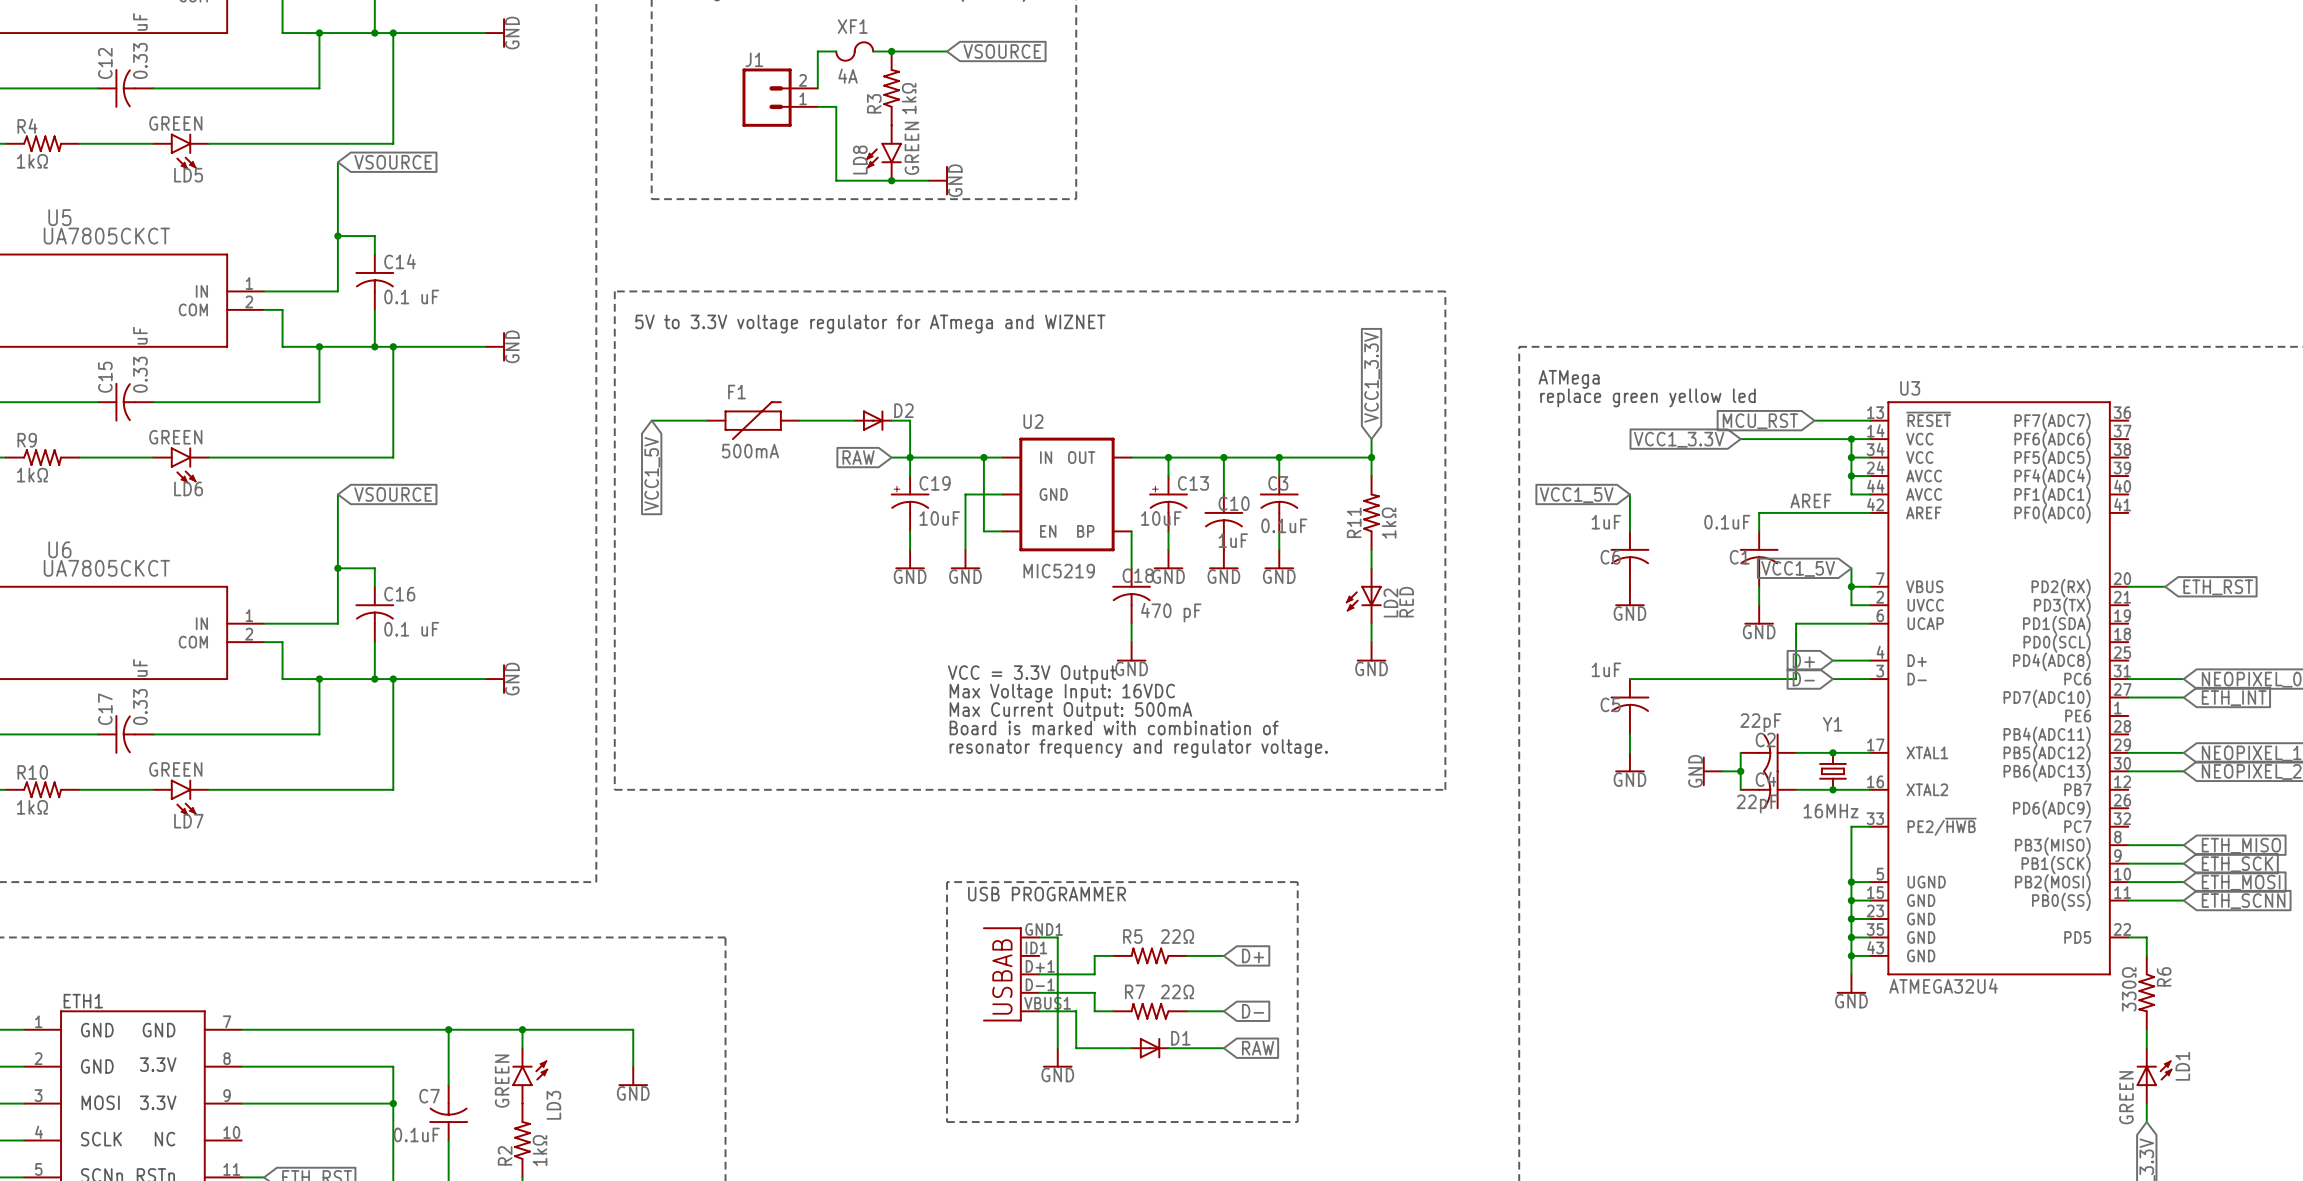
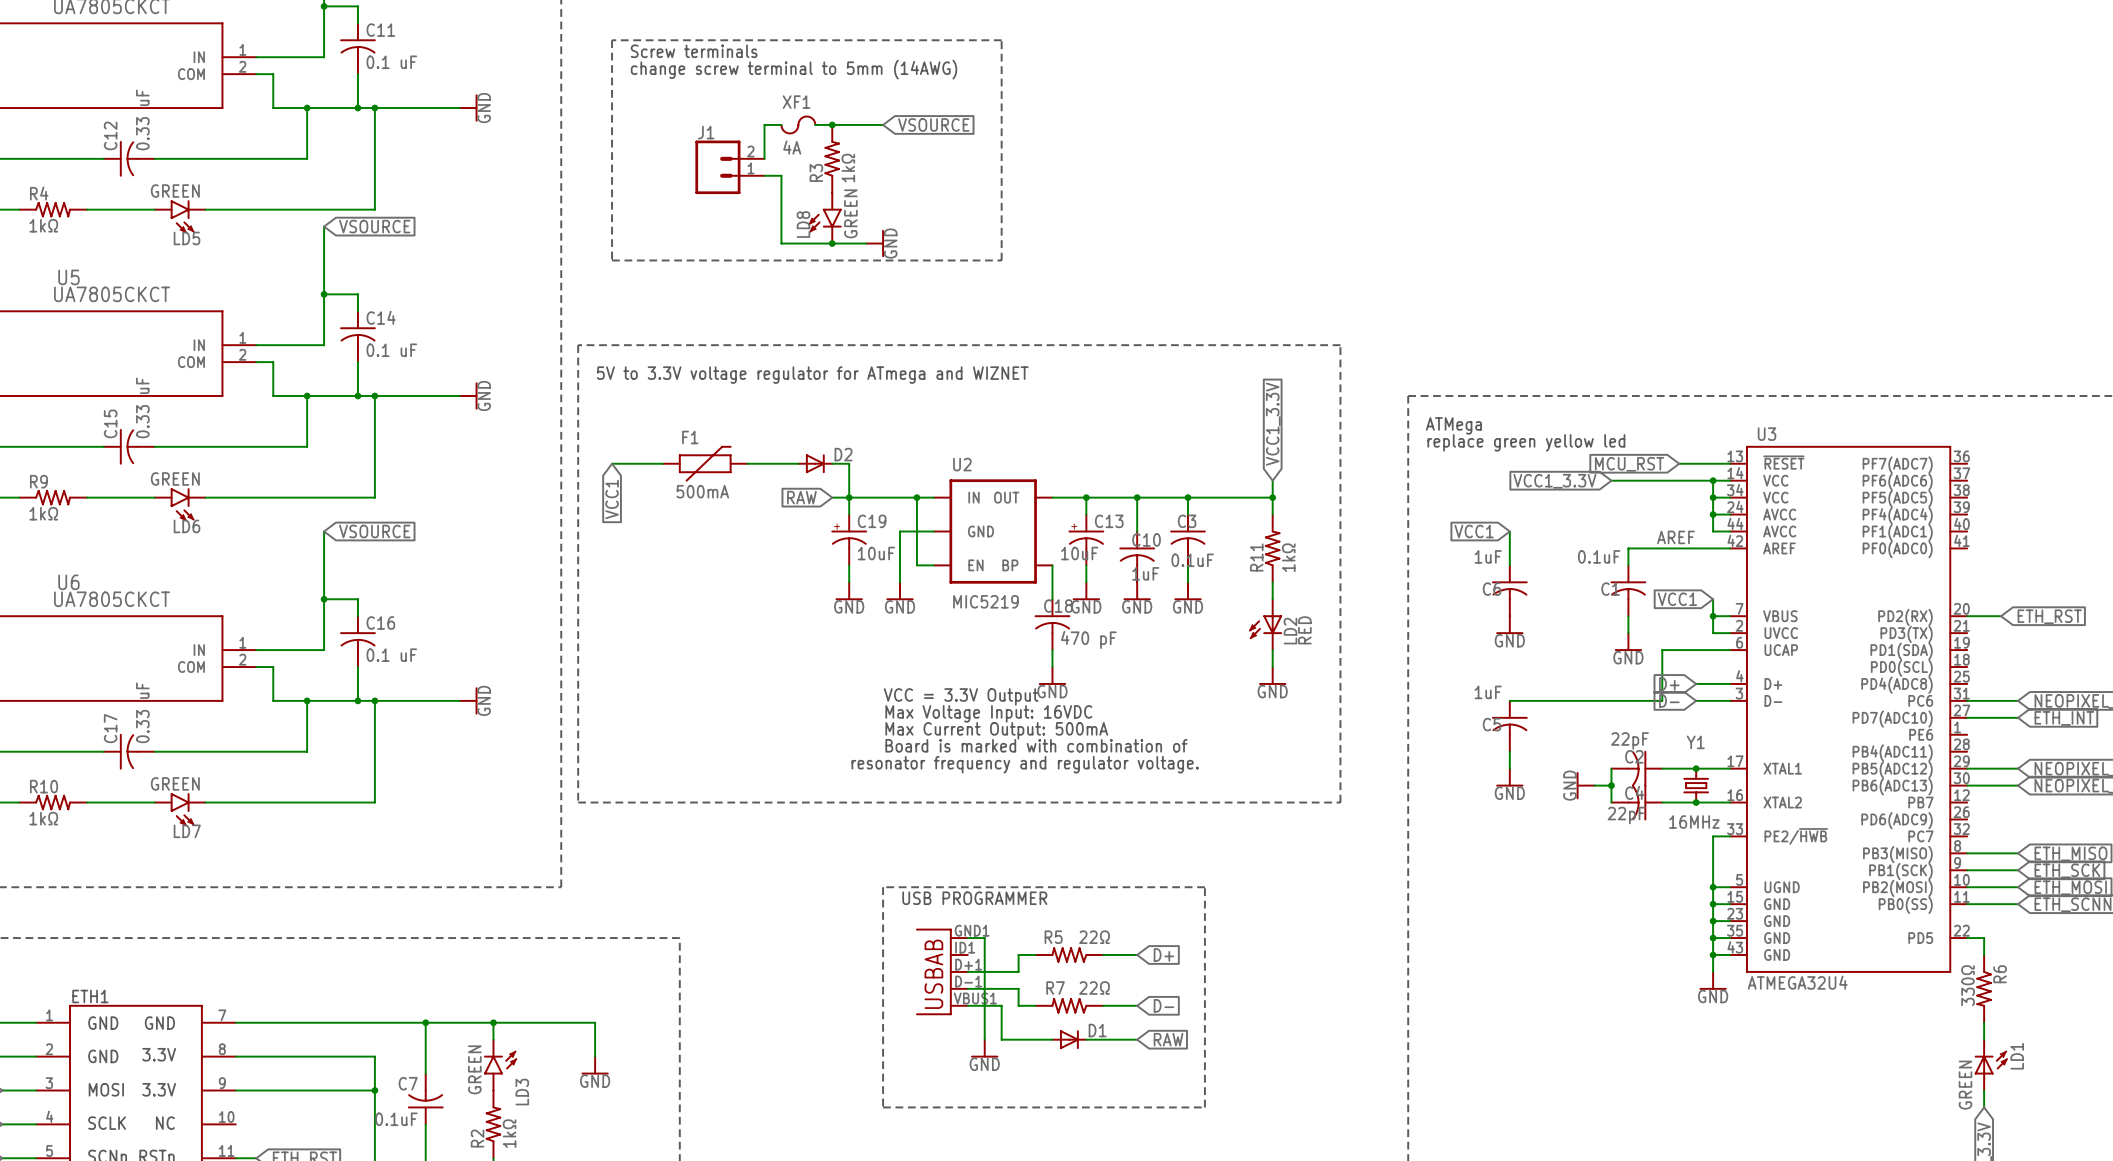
global label: VCC1_5V (652, 473) -> VCC1 (612, 499)
global label: VCC1_5V (1576, 495) -> VCC1 (1474, 531)
global label: VCC1_5V (1798, 568) -> VCC1 (1677, 599)
text position: resonator frequency and regulator voltage. (1138, 748) -> resonator frequency and regulator voltage. (1025, 764)

